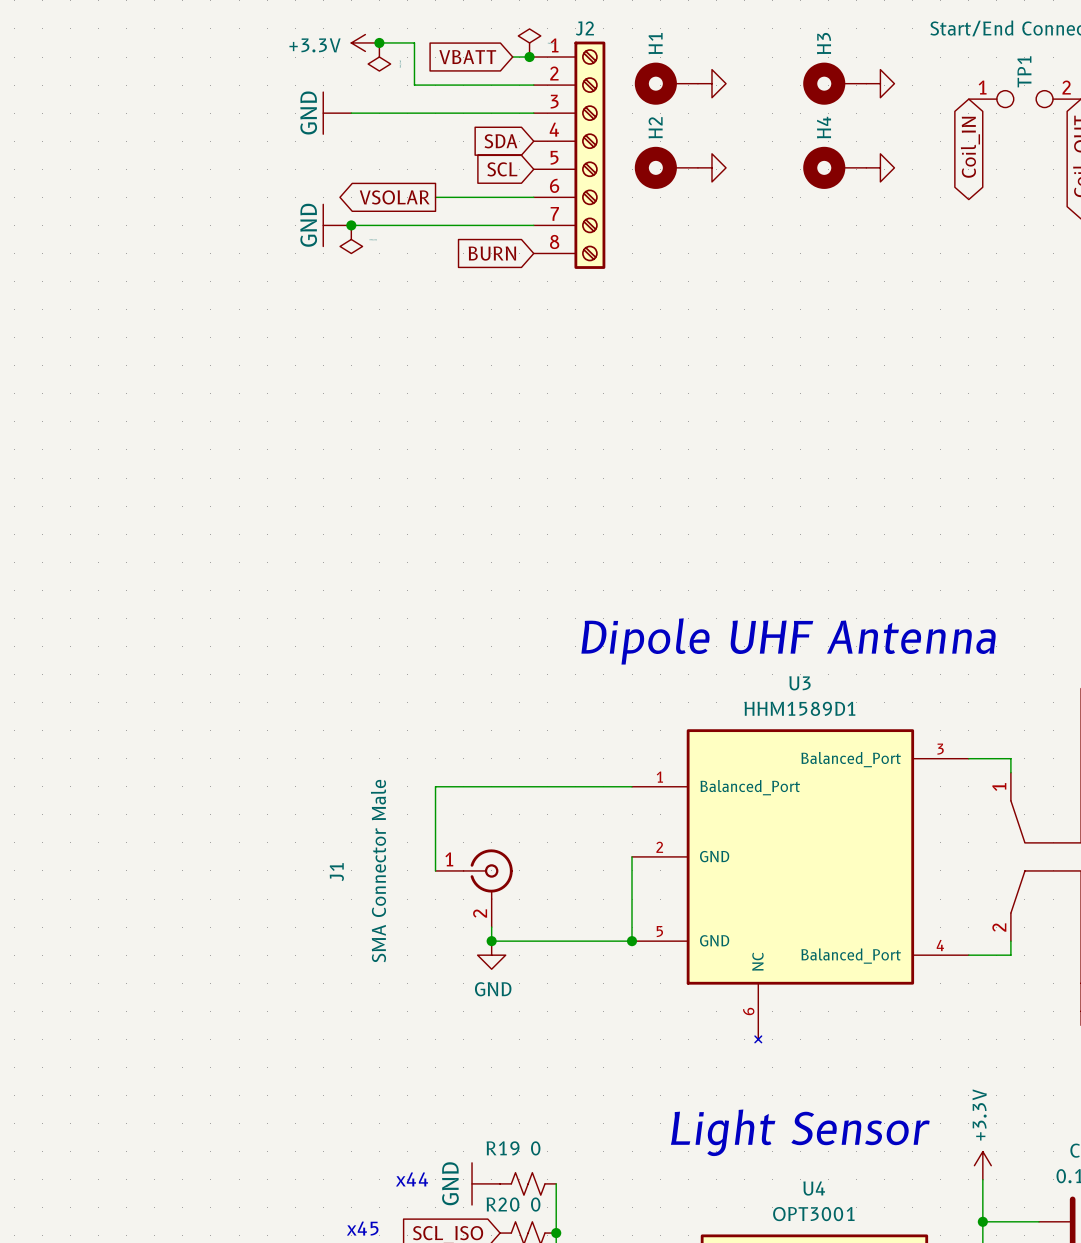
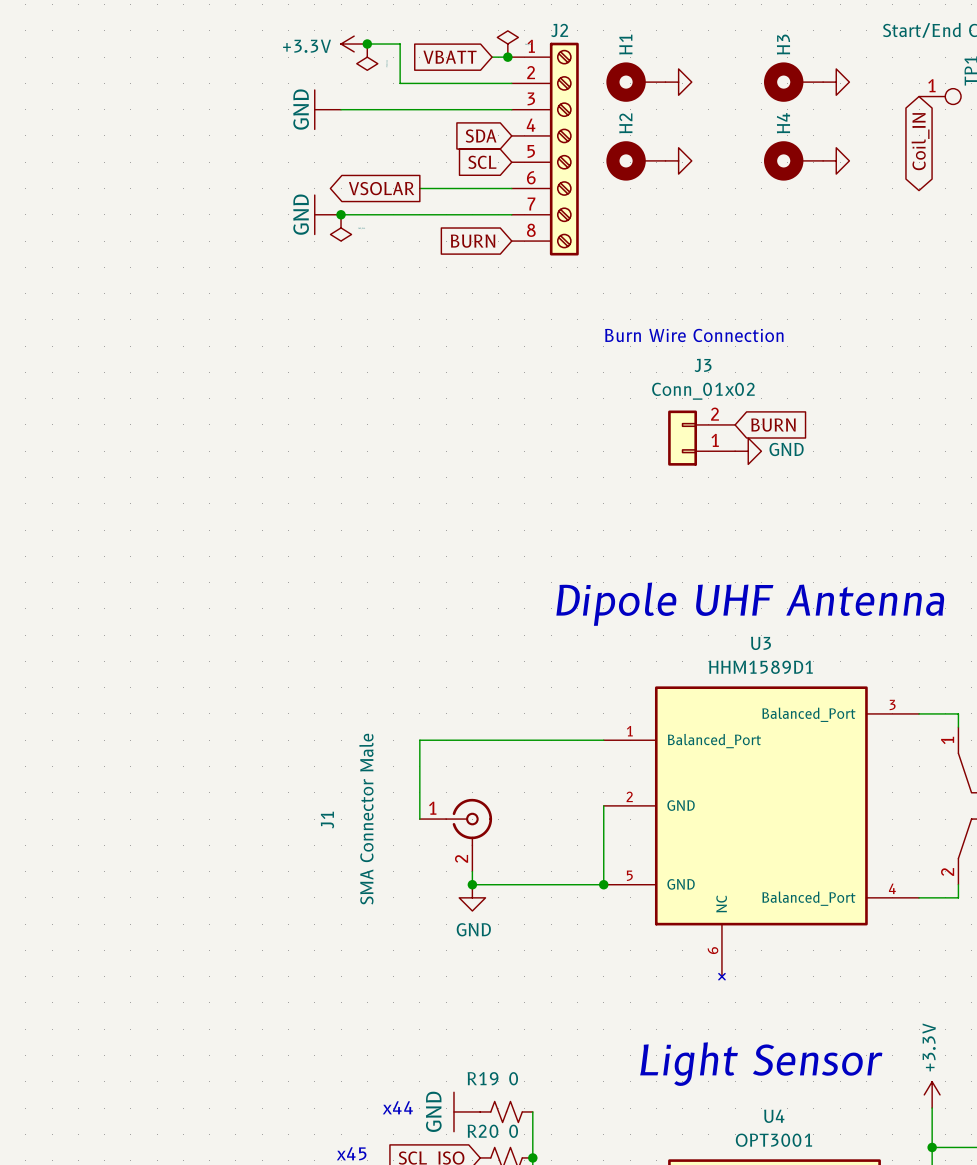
text: none -> Burn Wire Connection (694, 335)
global label: none -> BURN (773, 425)
J3: none -> Conn_01x02 (701, 438)
power symbol: none -> GND (748, 451)

